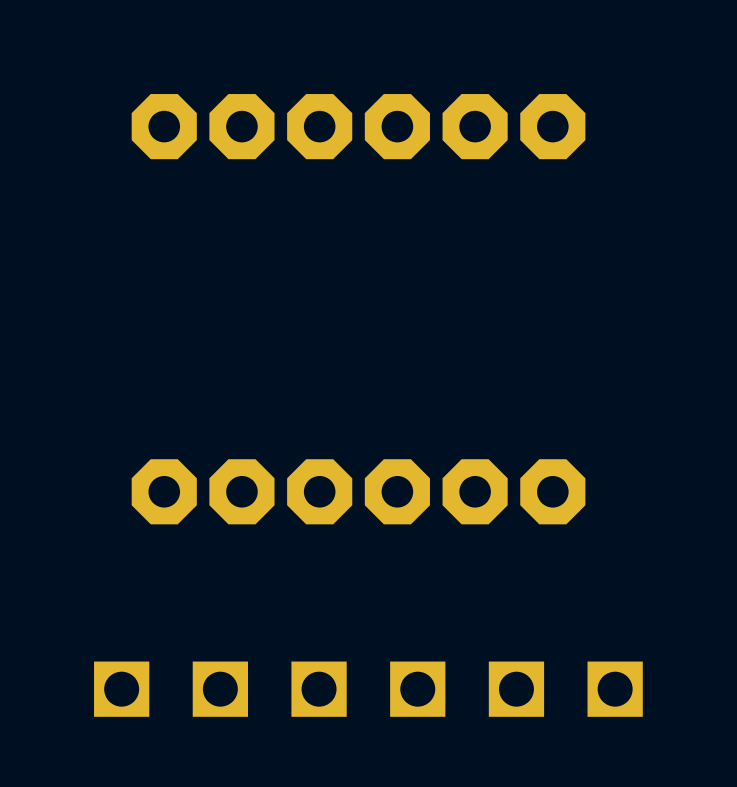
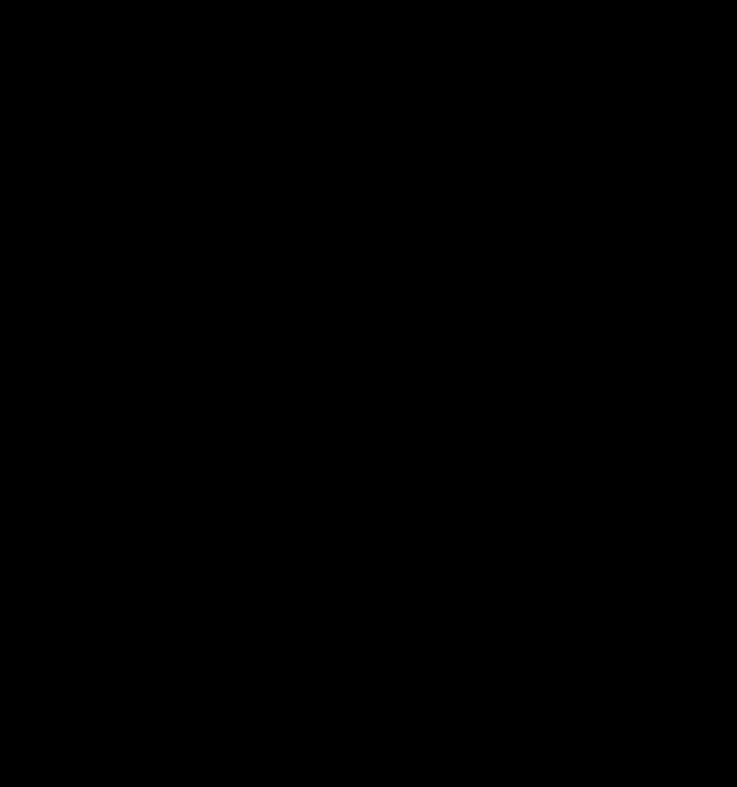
part: (358, 126) -> none
part: (358, 491) -> none
part: (368, 689) -> none

